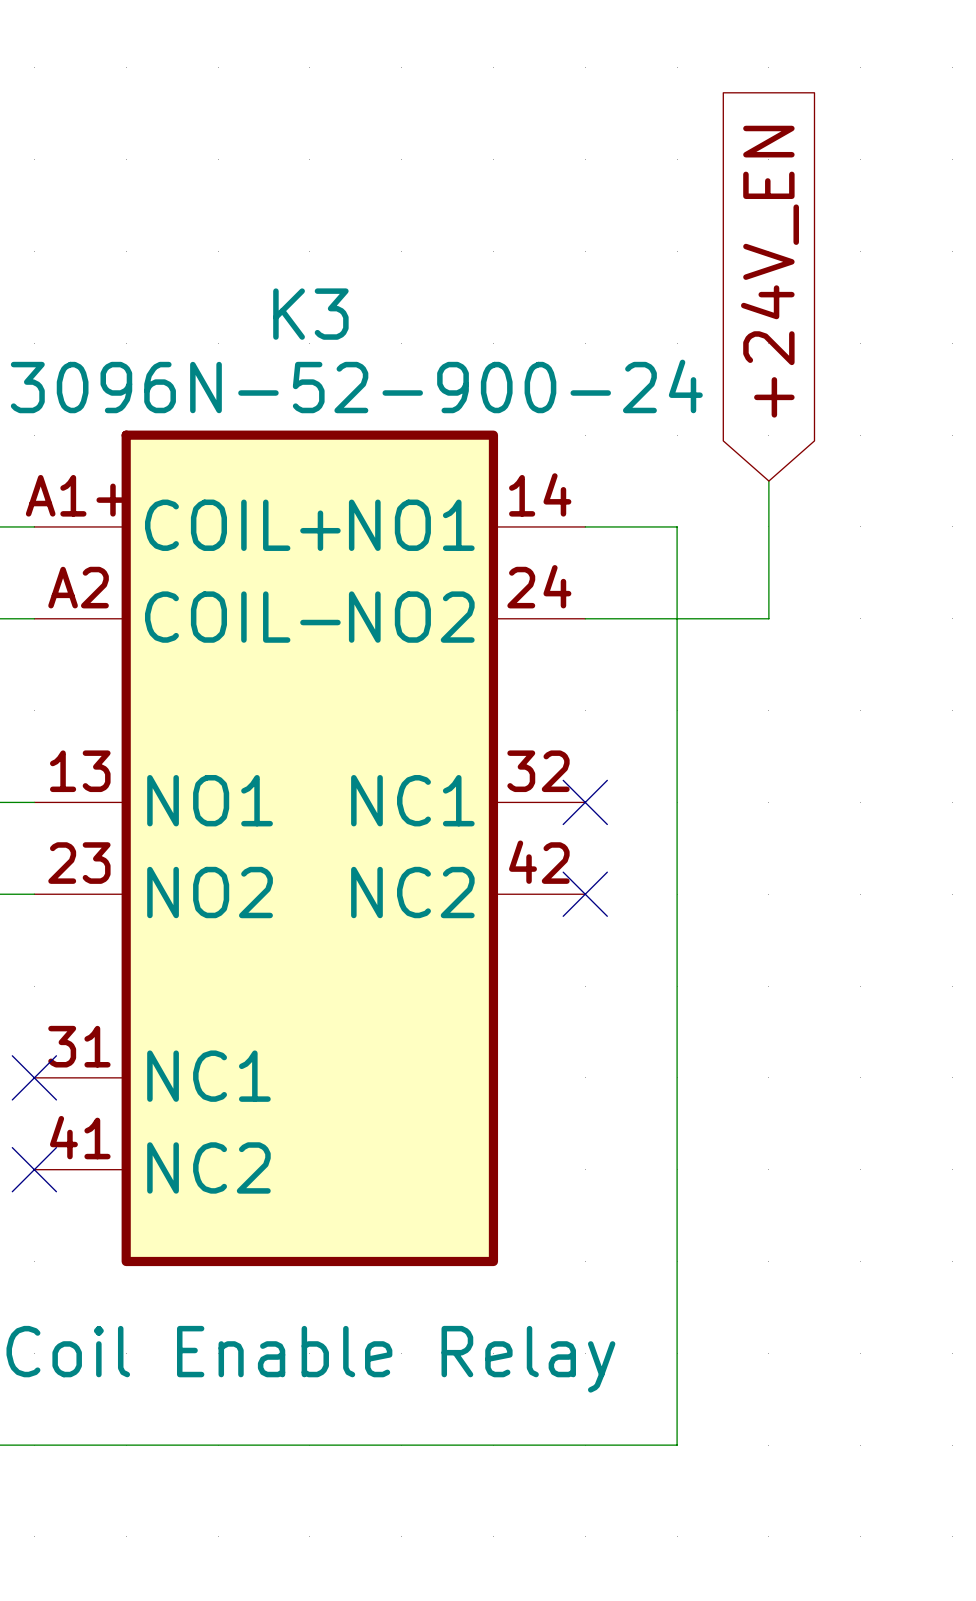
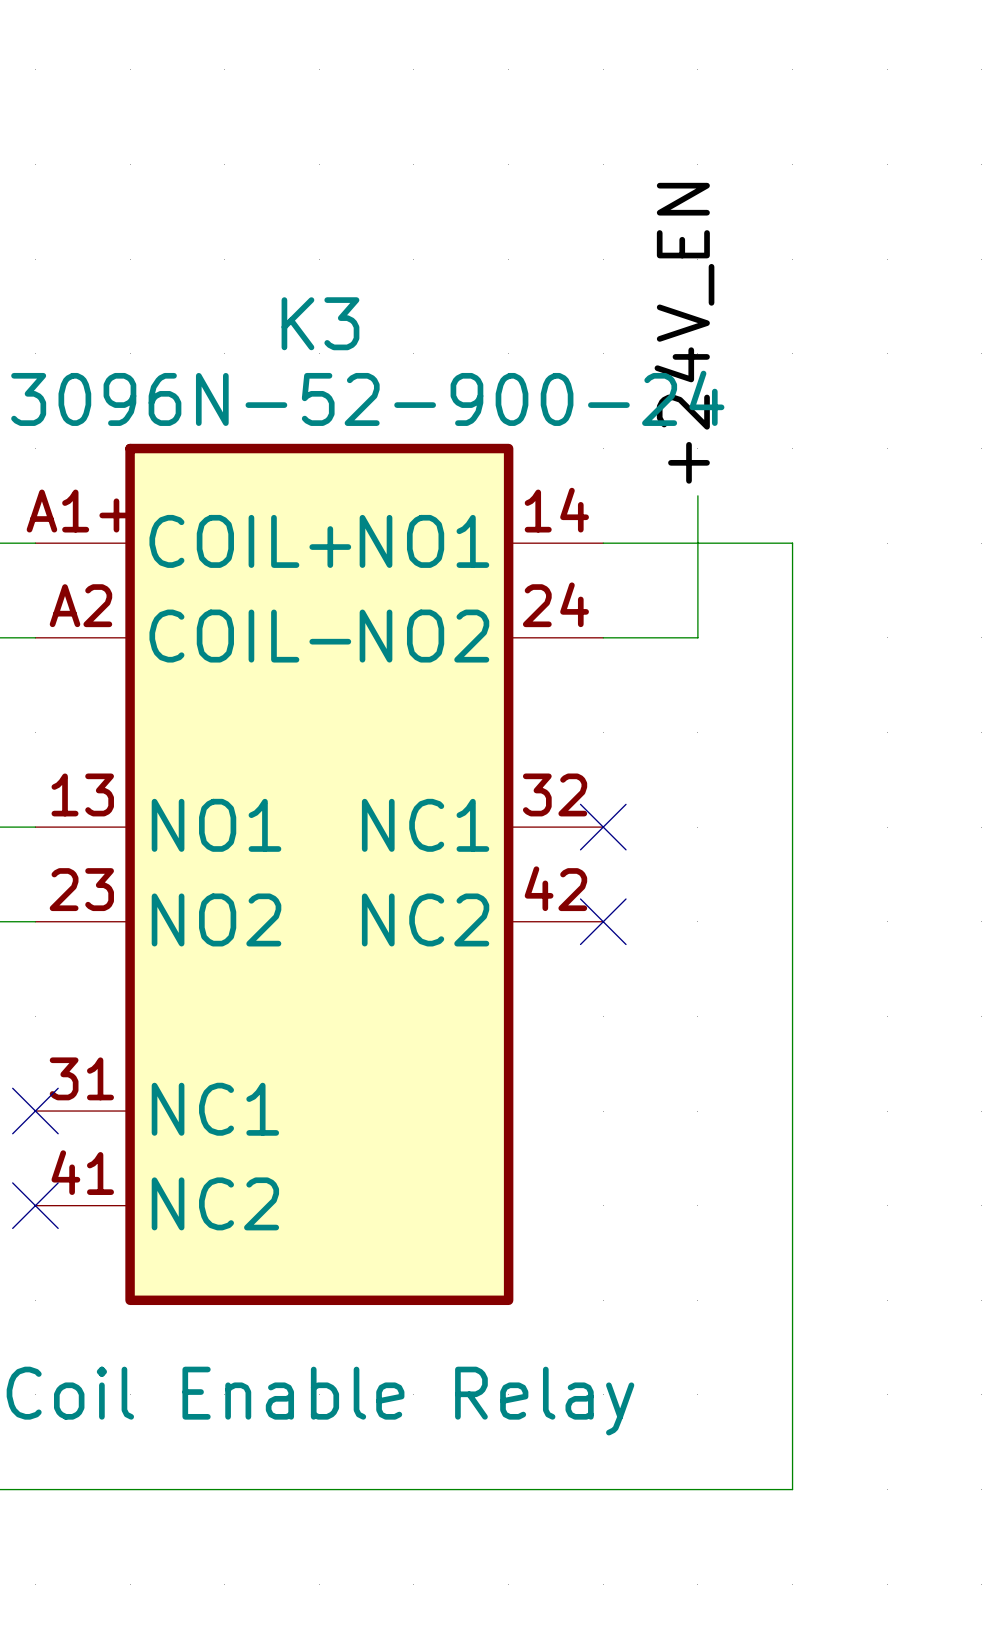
global label: +24V_EN (769, 271) -> none
label: none -> +24V_EN (684, 333)
wire: (768, 481) (768, 526) -> (697, 495) (697, 543) (792, 543)
wire: (768, 618) (677, 618) (677, 1445) -> (792, 637) (792, 1489) (697, 1489)

